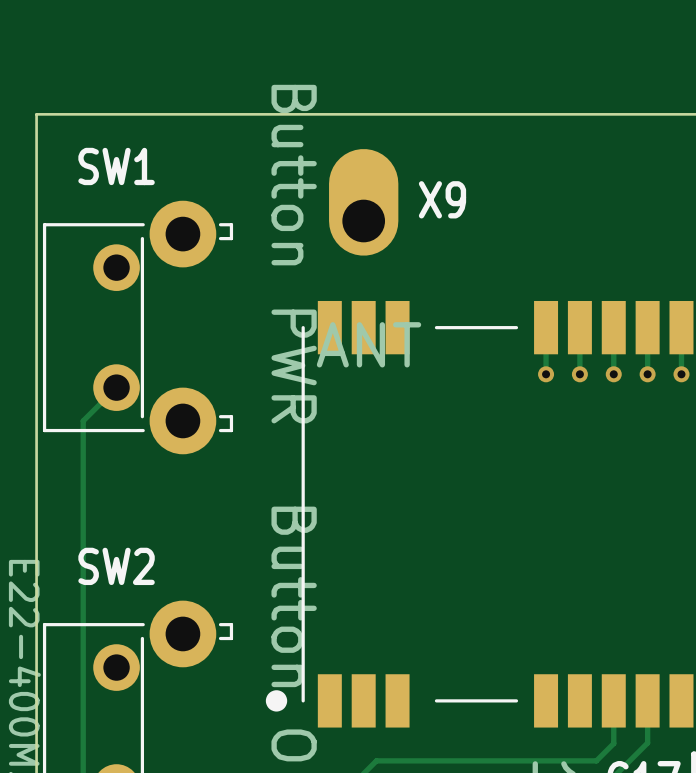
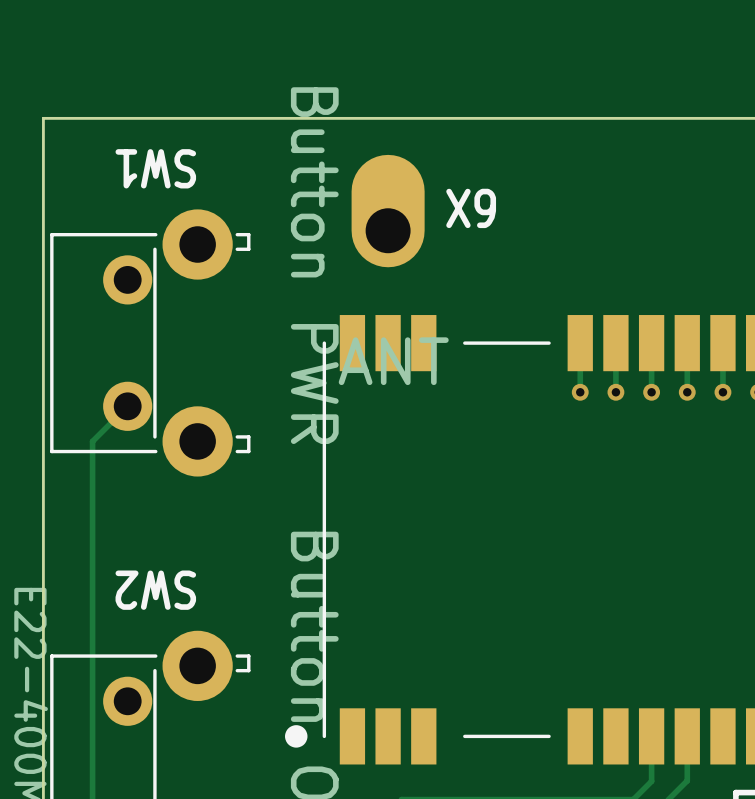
SW1 name rotation: 0° (116, 166) -> 180° (155, 168)
SW2 name rotation: 0° (116, 566) -> 180° (155, 590)

